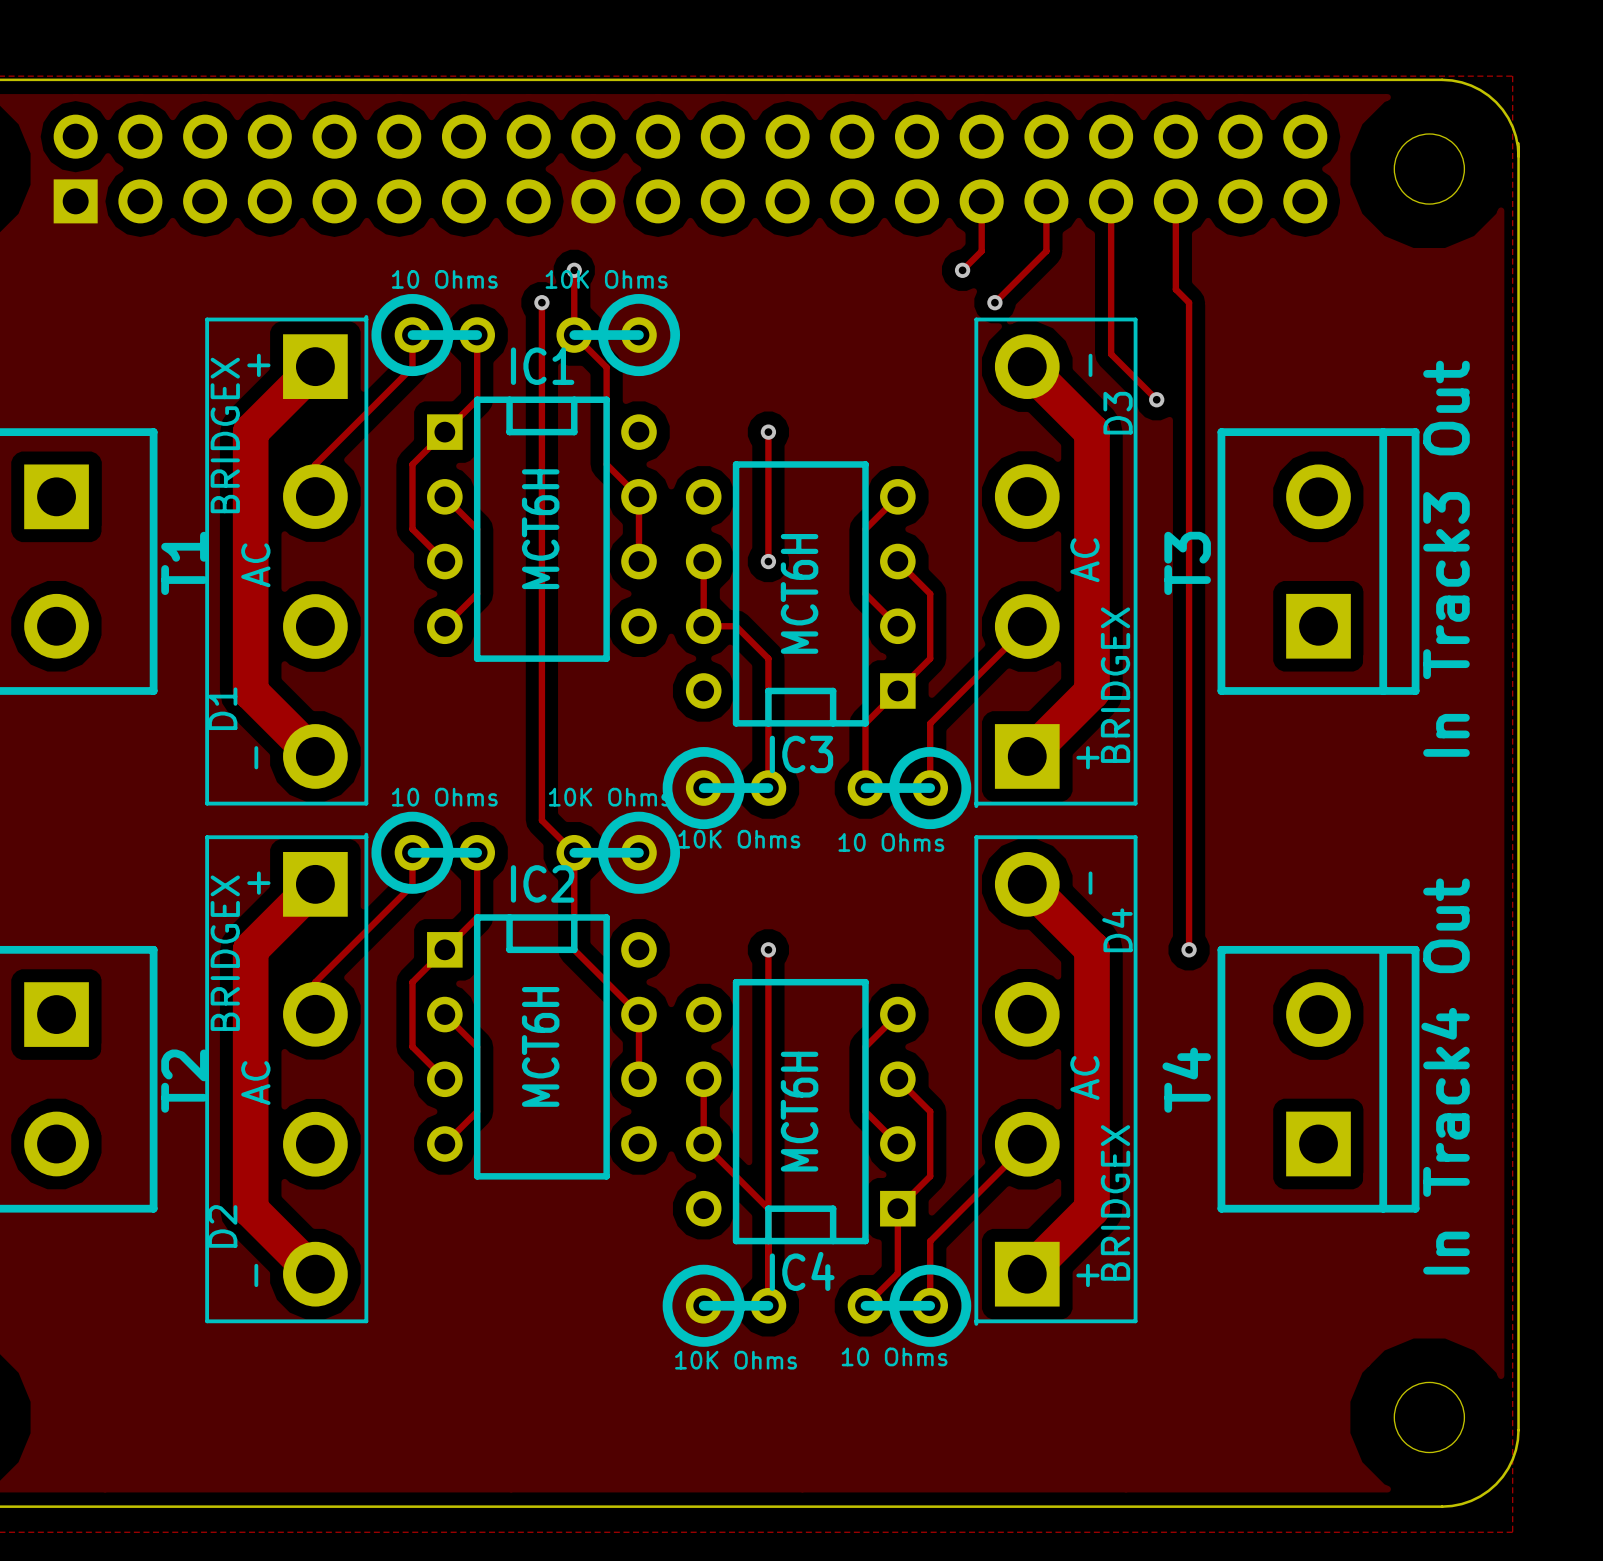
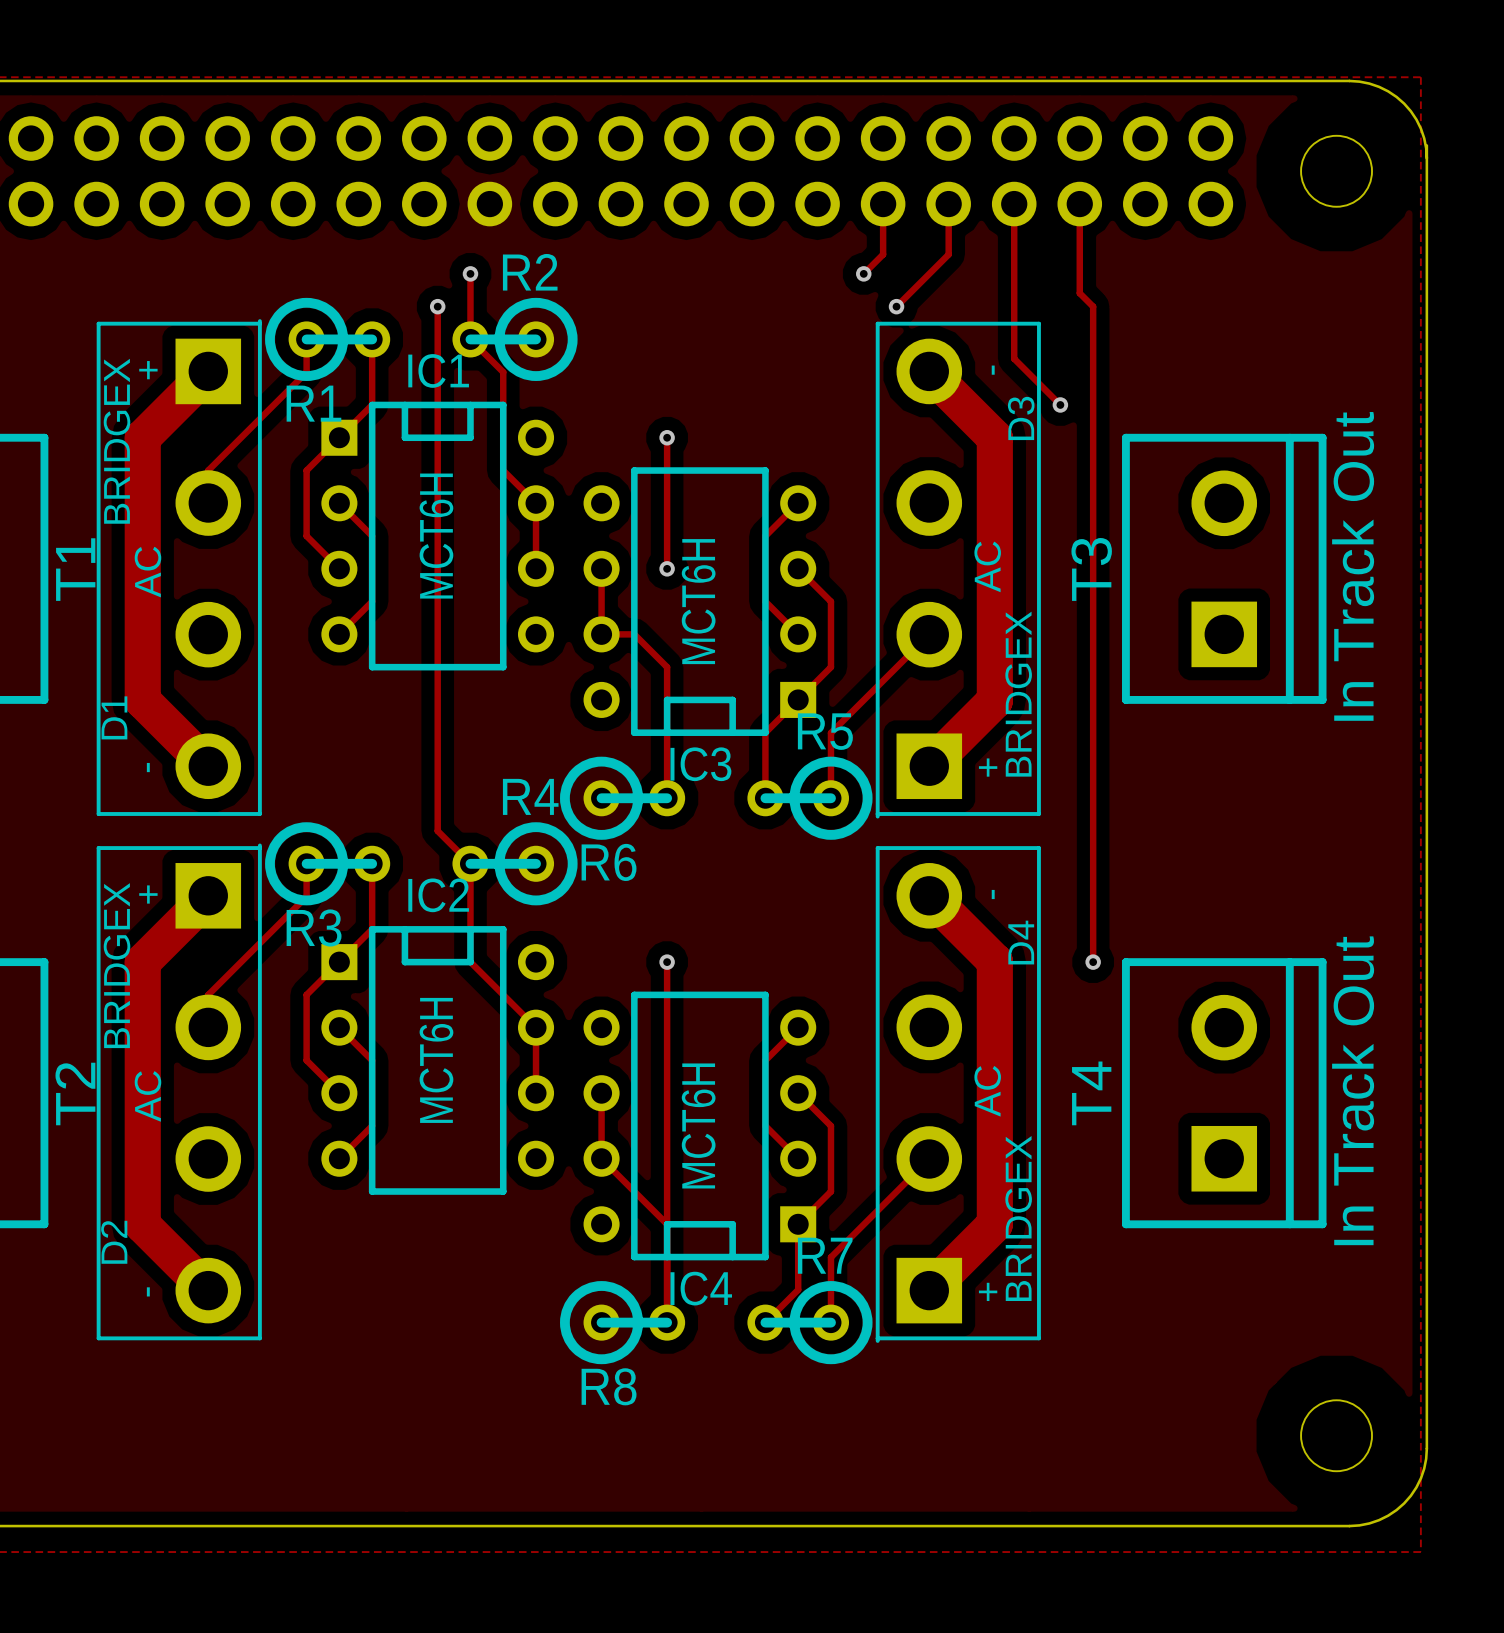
R2 name: none -> R2 (530, 272)
R1 value: 10 Ohms (444, 279) -> none
R2 value: 10K Ohms (606, 279) -> none
R1 name: none -> R1 (313, 403)
T3 value: In Track3 Out (1446, 558) -> In Track Out (1353, 566)
R5 name: none -> R5 (825, 731)
R4 name: none -> R4 (530, 796)
R3 value: 10 Ohms (444, 797) -> none
R4 value: 10K Ohms (609, 797) -> none
R6 value: 10K Ohms (739, 839) -> none
R5 value: 10 Ohms (891, 842) -> none
R6 name: none -> R6 (609, 862)
R3 name: none -> R3 (314, 927)
T4 value: In Track4 Out (1445, 1076) -> In Track Out (1353, 1090)
R7 name: none -> R7 (825, 1255)
R7 value: 10 Ohms (894, 1356) -> none
R8 value: 10K Ohms (736, 1360) -> none
R8 name: none -> R8 (609, 1386)

